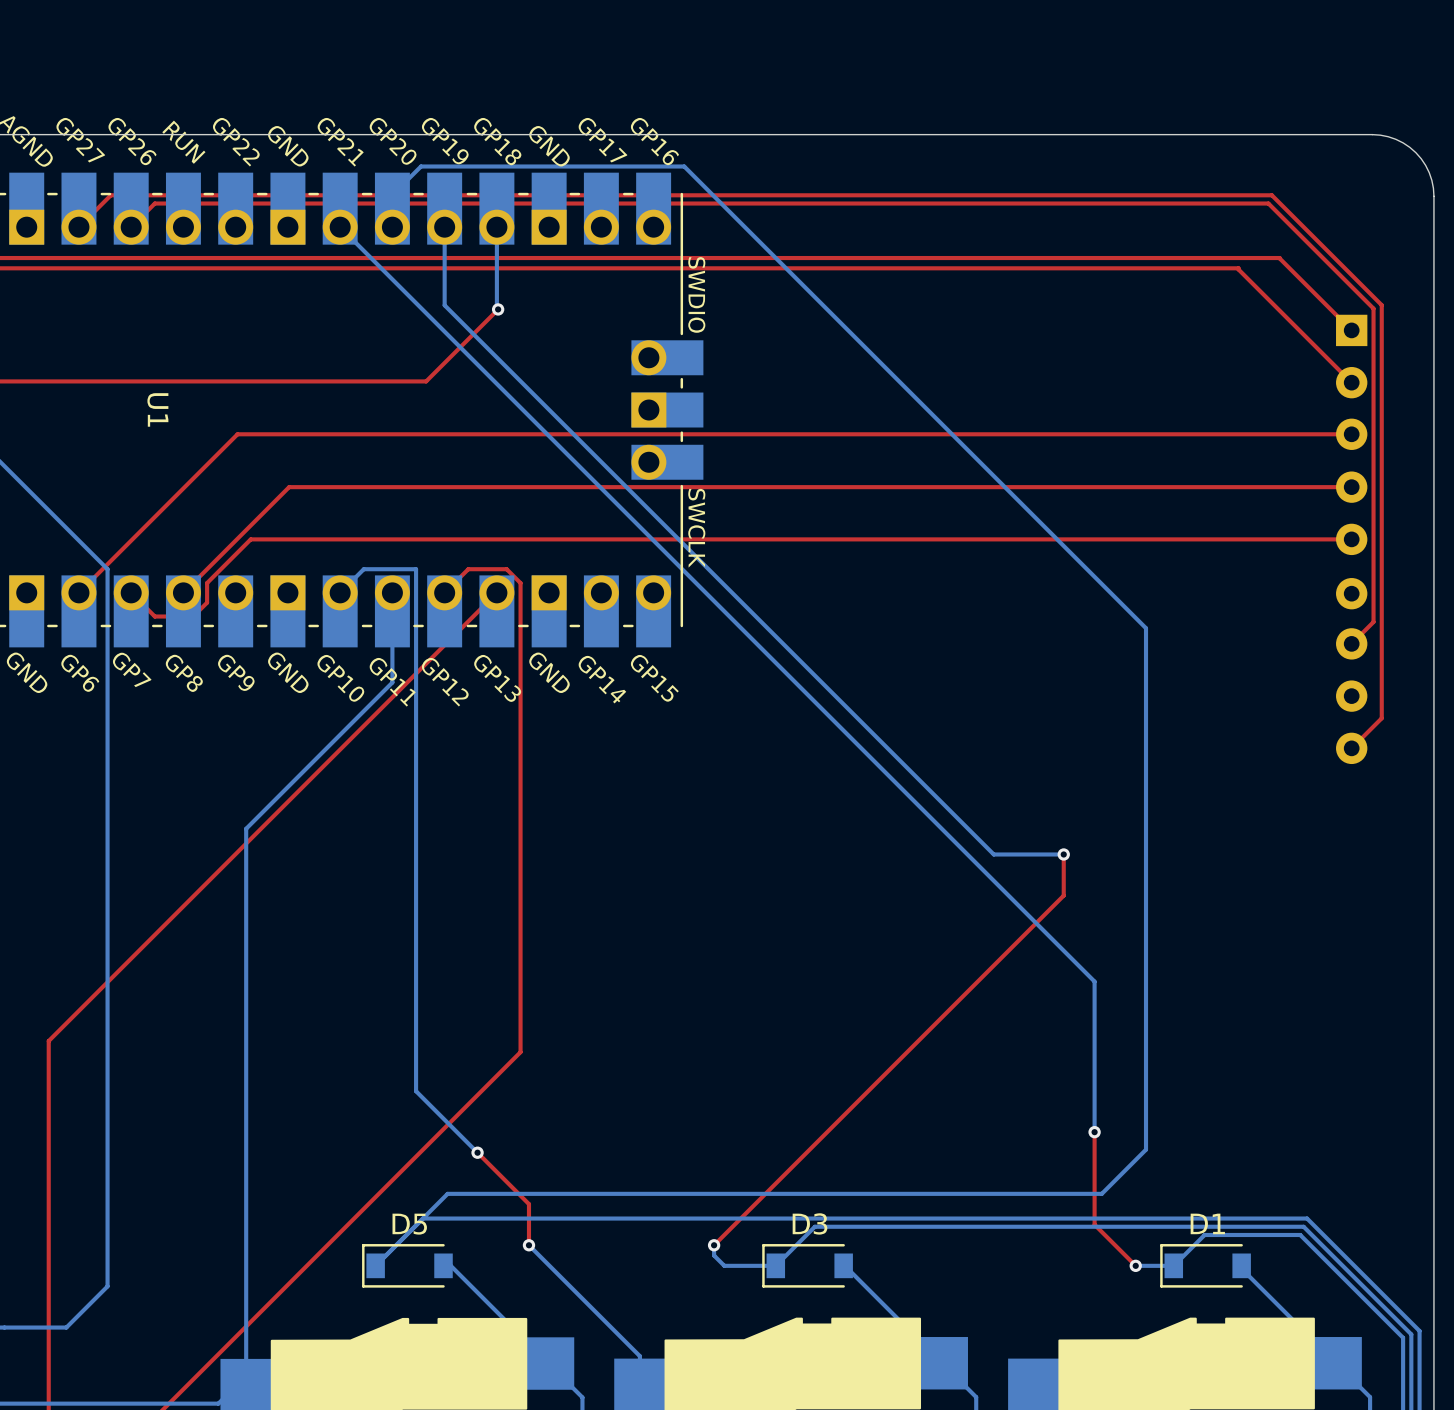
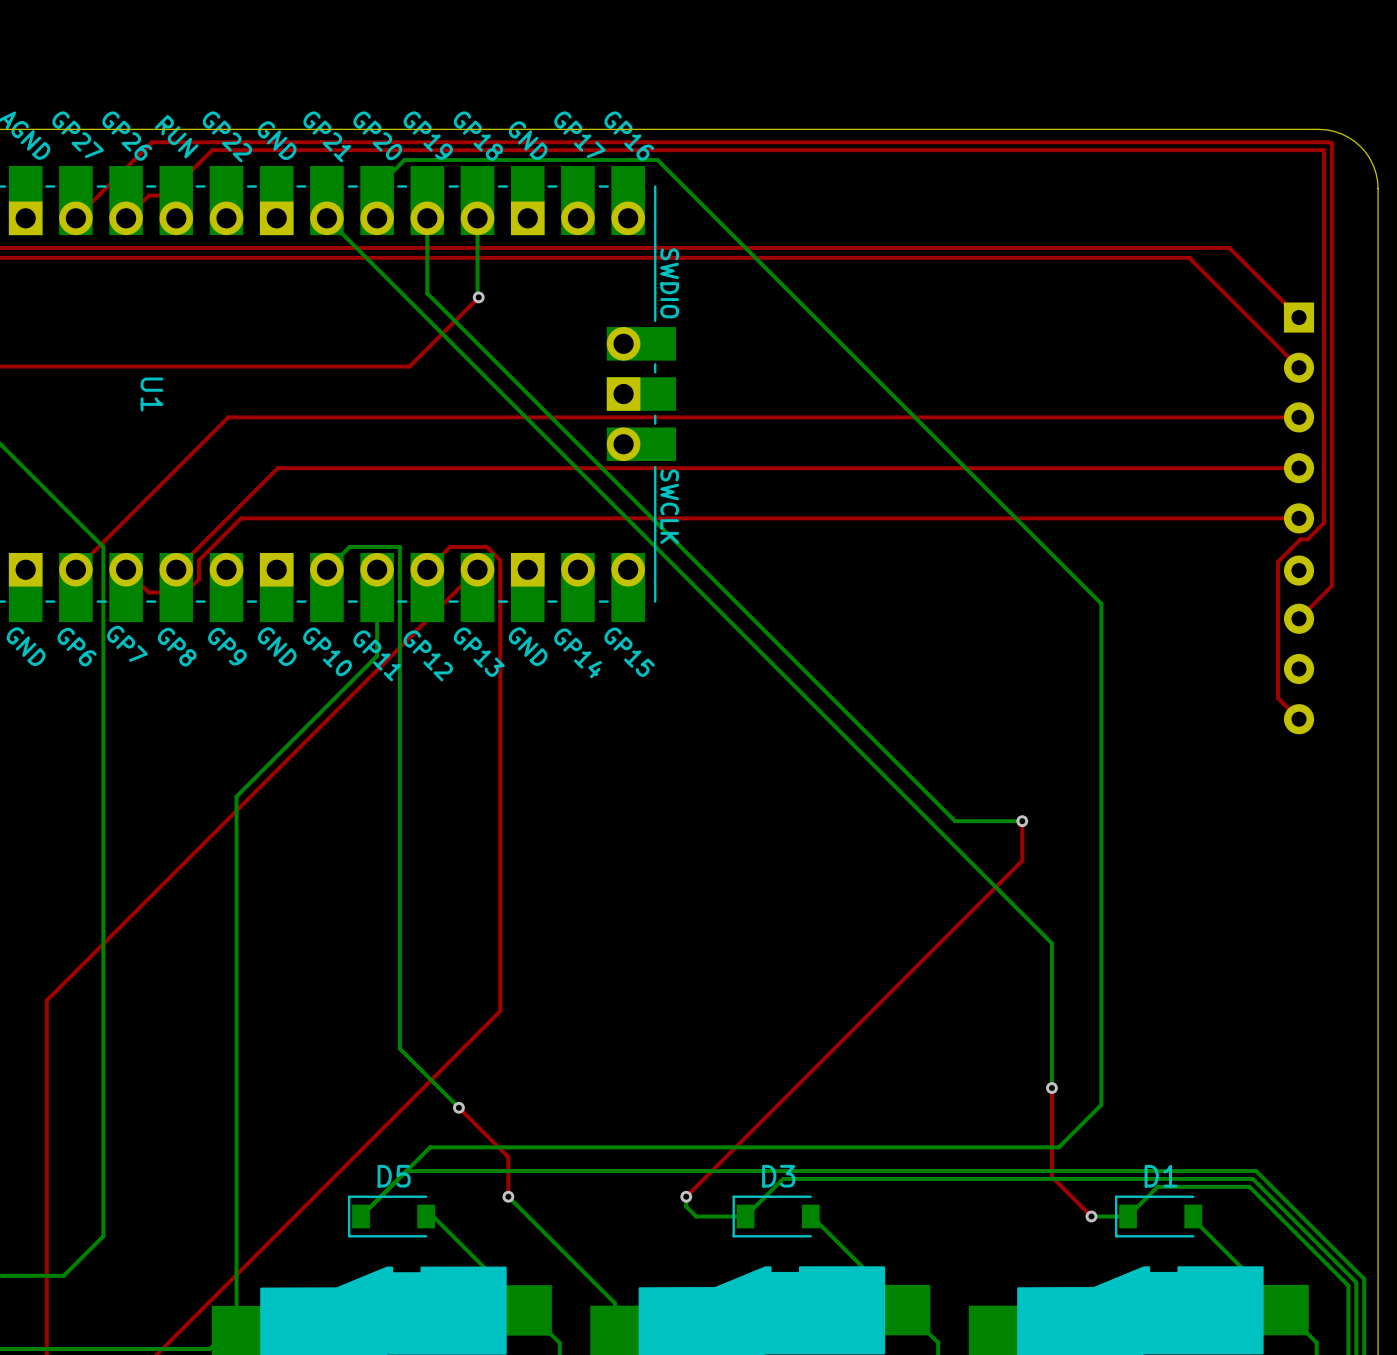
top track: (110, 195) (1271, 195) (1381, 305) (1381, 718) (1351, 748) -> (166, 195) (212, 150) (1323, 150) (1323, 523) (1307, 539) (1300, 539) (1278, 561) (1278, 698) (1299, 719)
top track: (173, 203) (1268, 203) (1373, 308) (1373, 622) -> (106, 187) (151, 142) (1331, 143) (1331, 585) (1320, 597)

